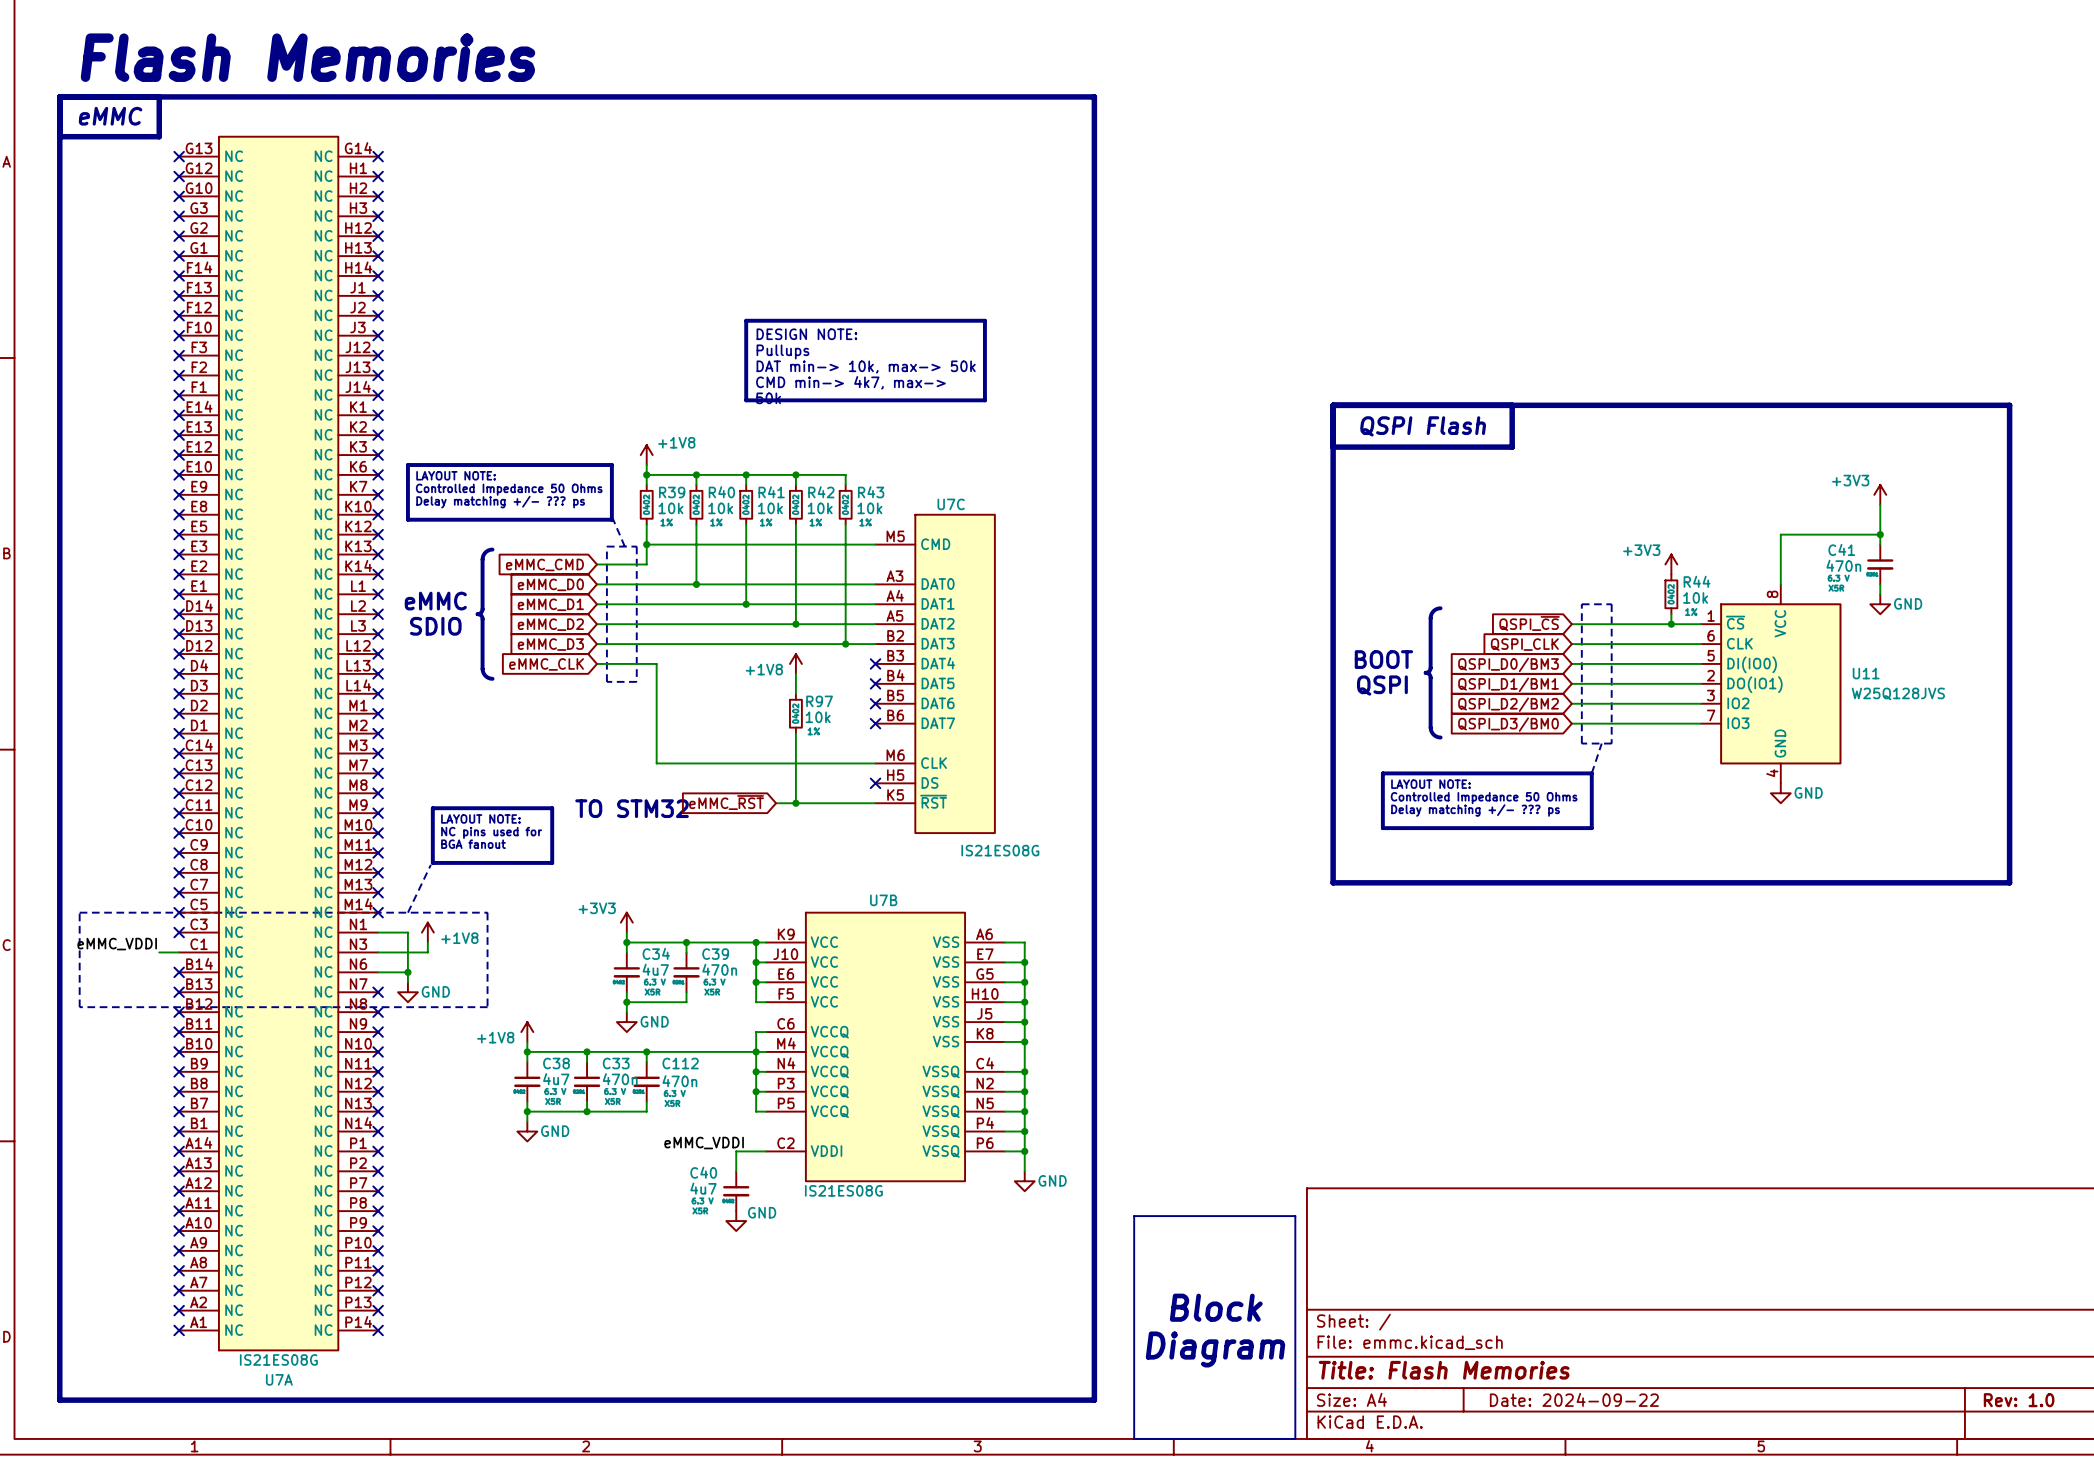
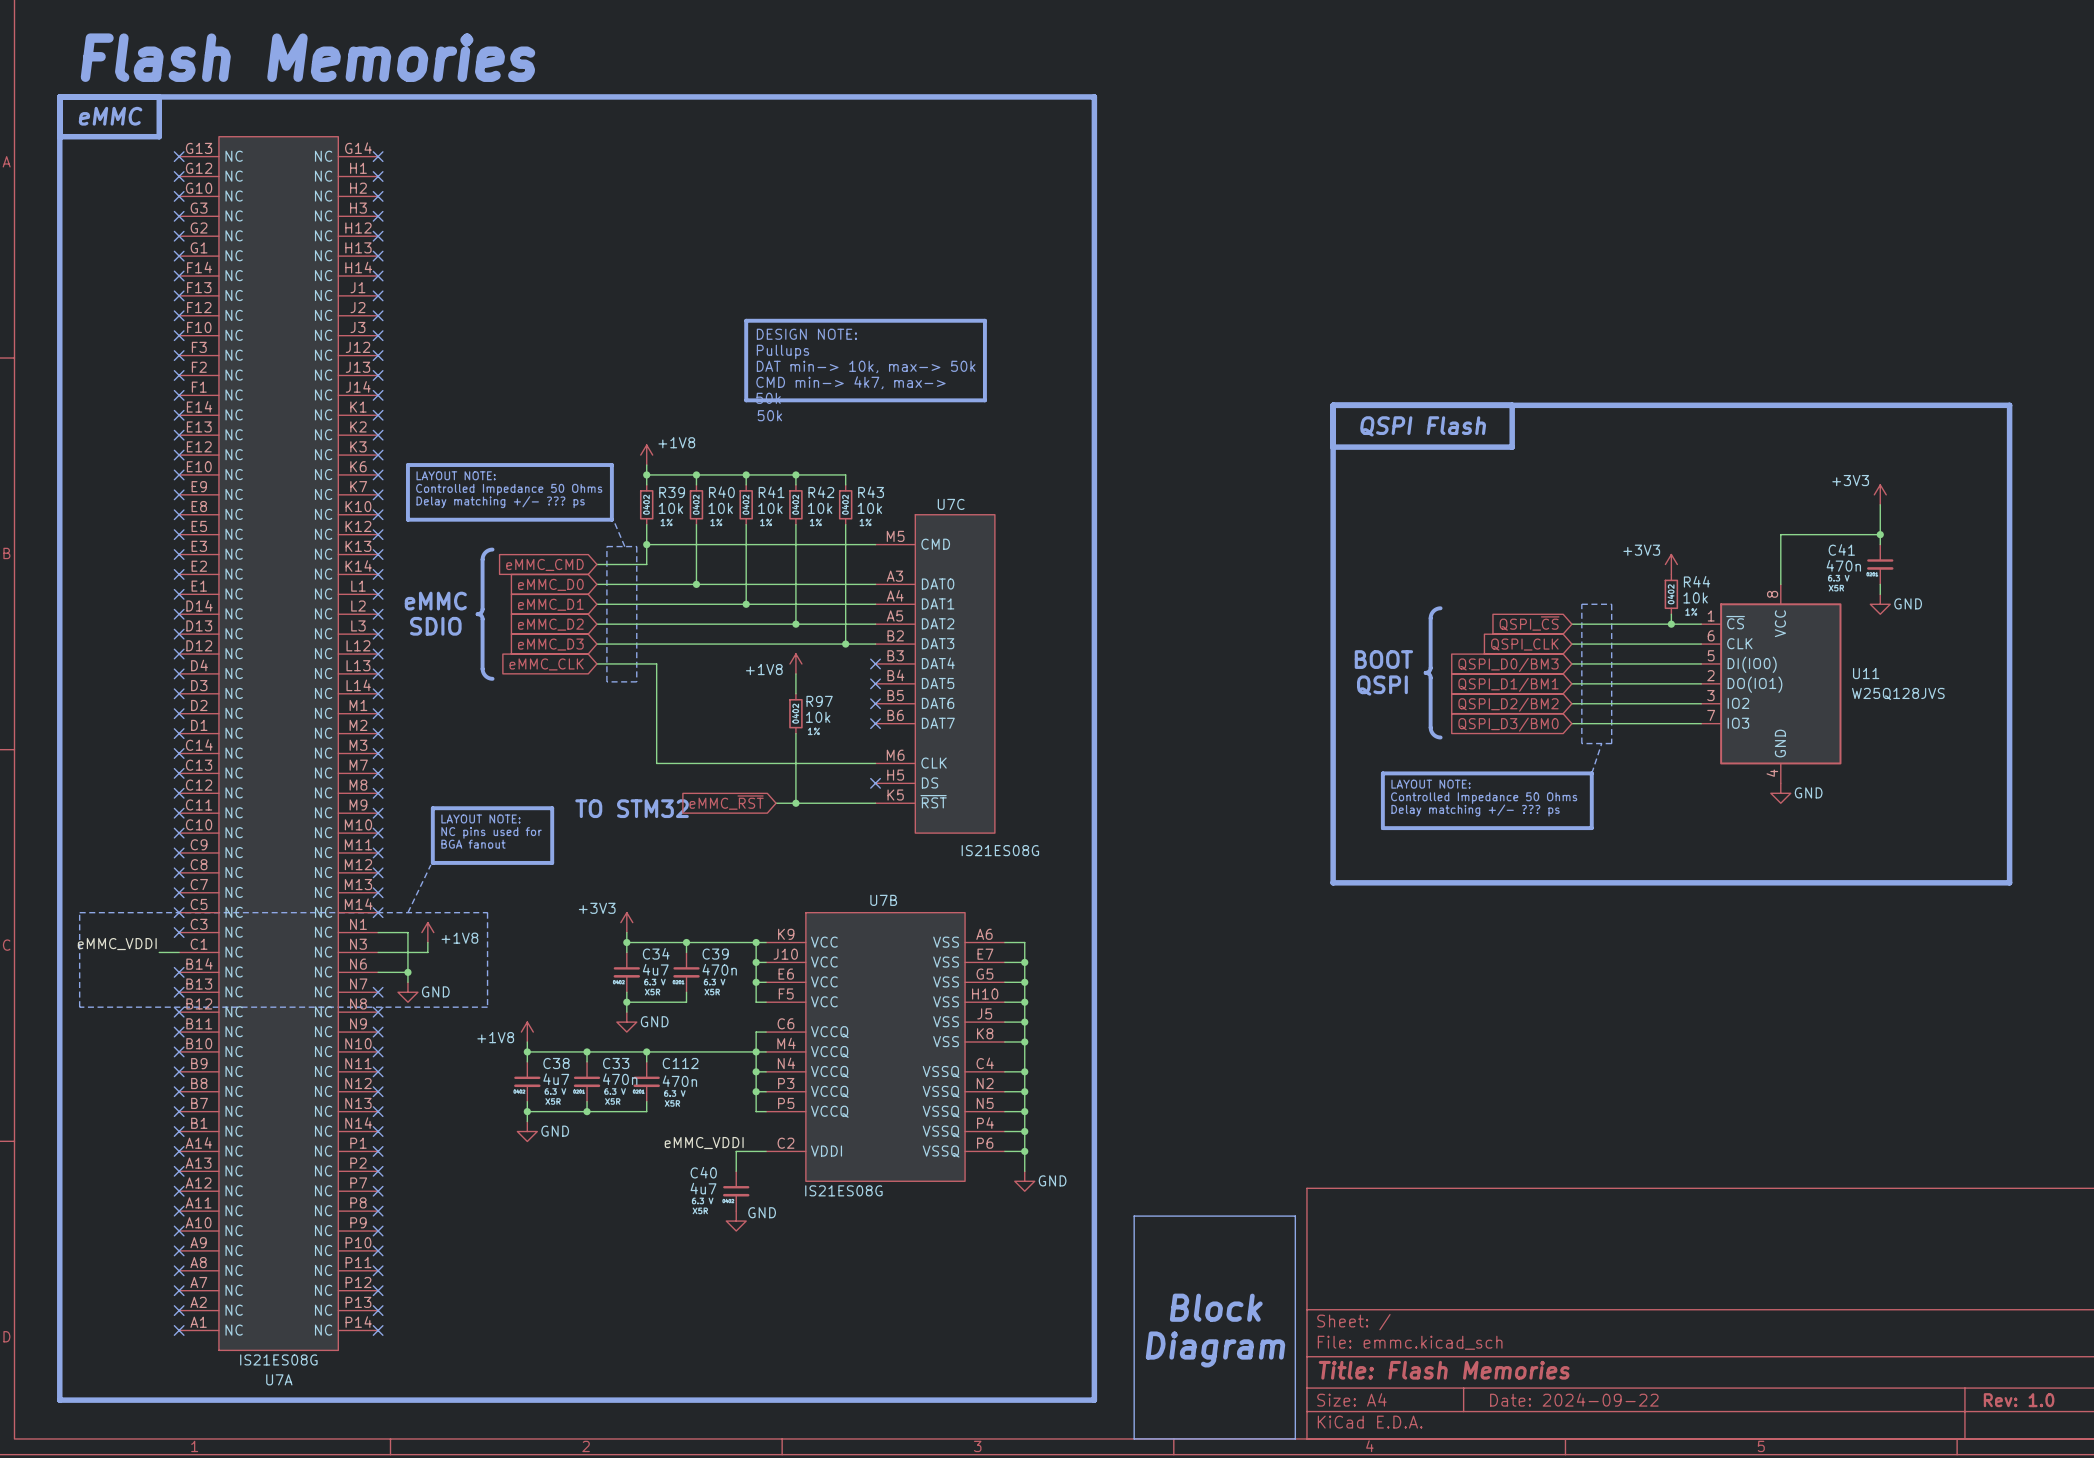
text: none -> 50k (769, 415)

